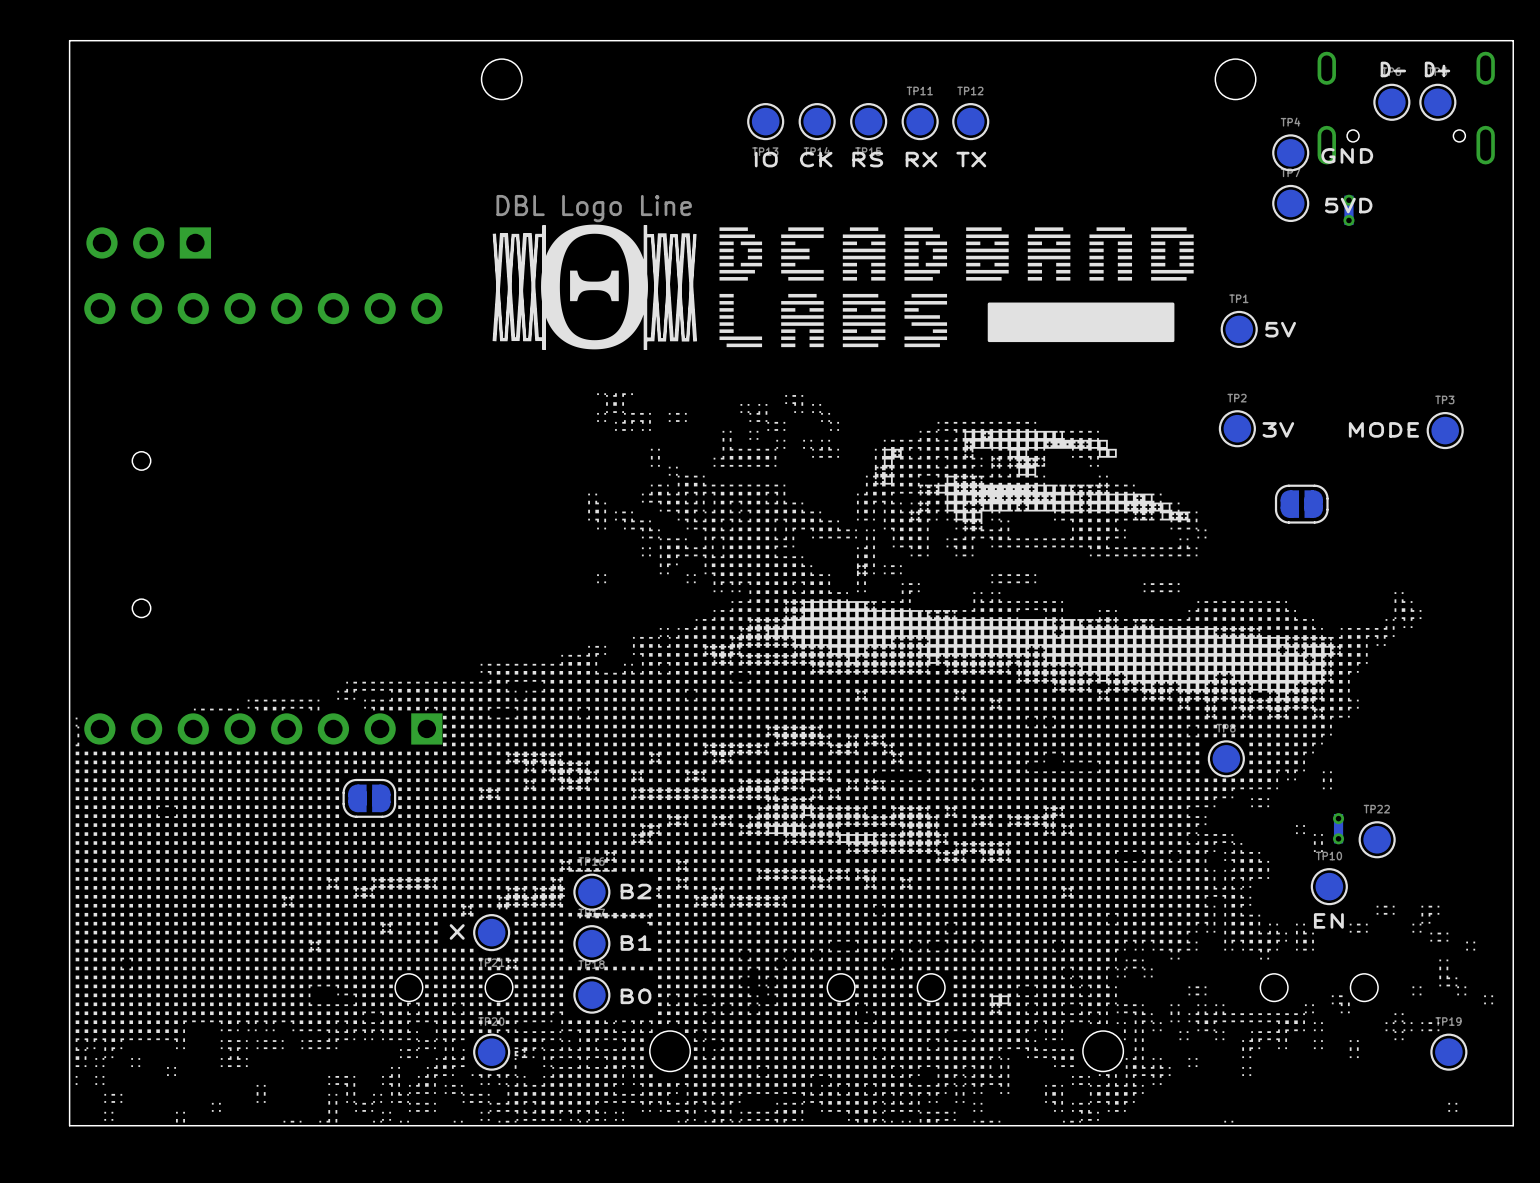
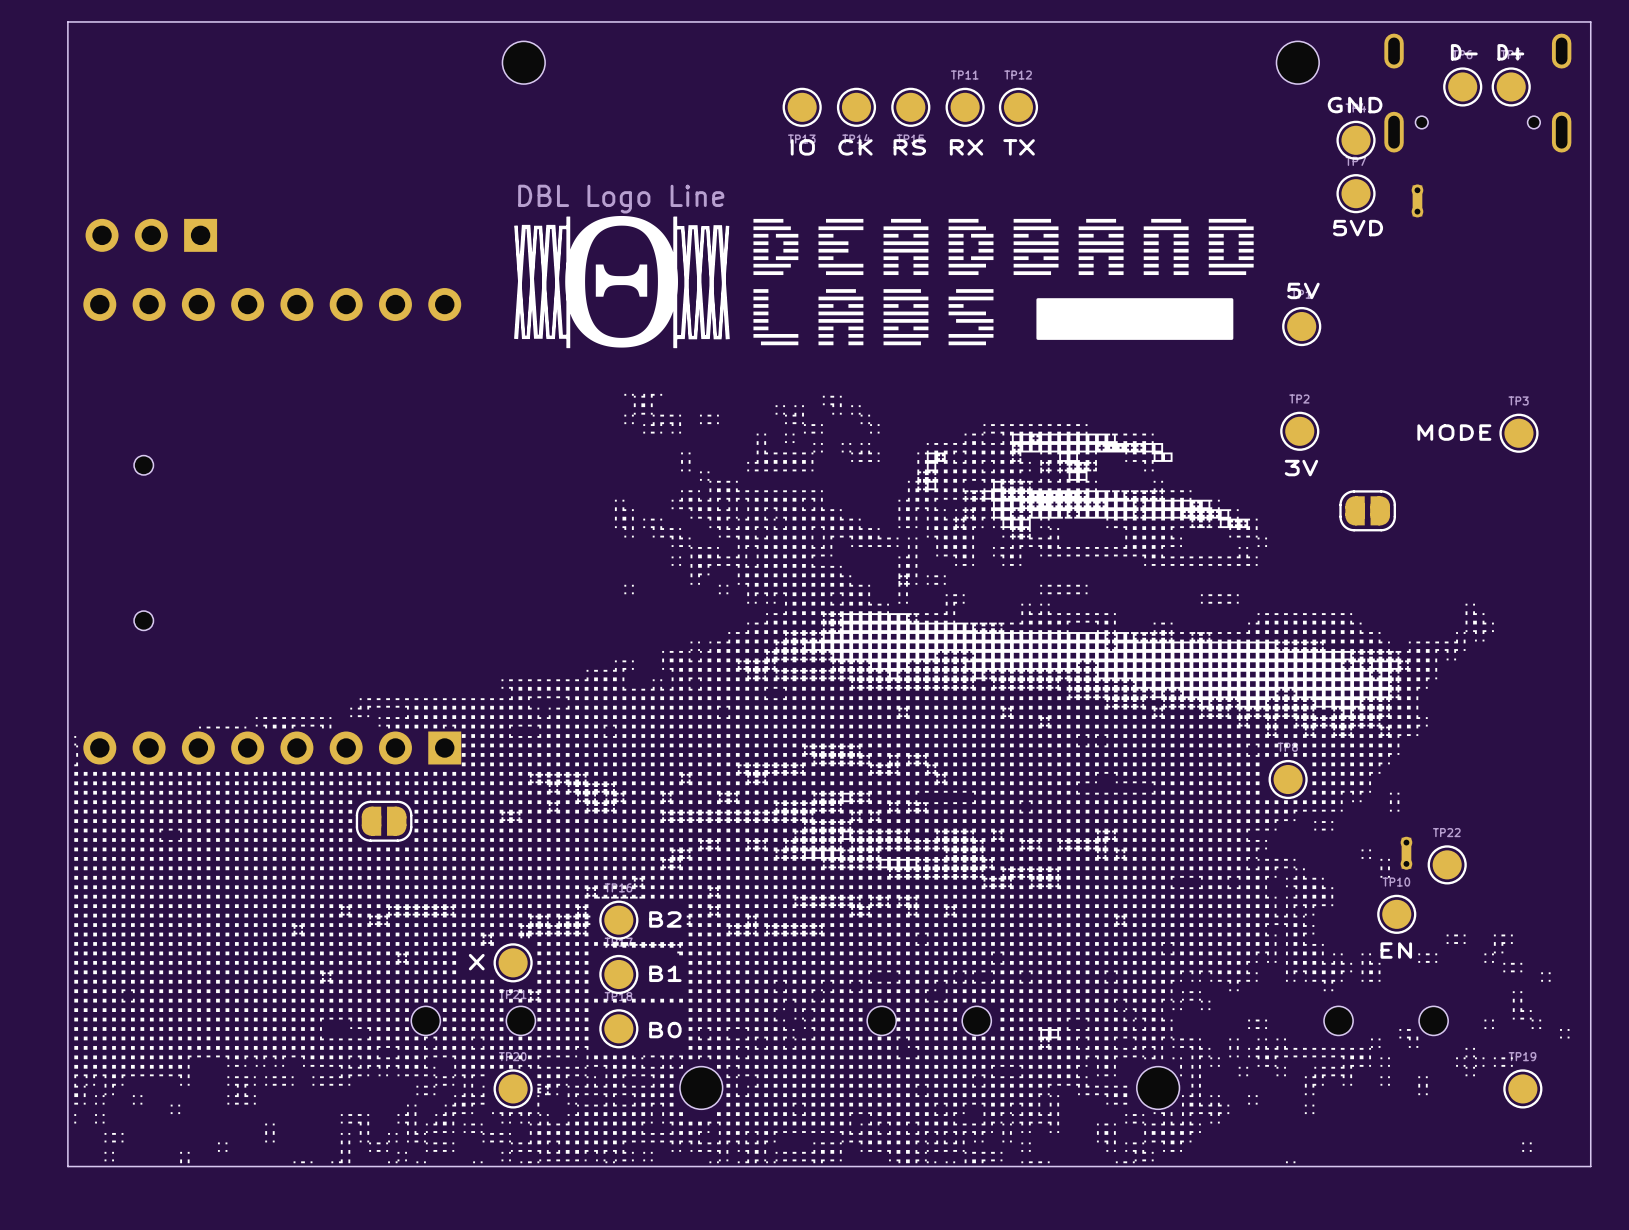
text position: GND (1347, 155) -> GND (1355, 105)
text position: 5VD (1348, 205) -> 5VD (1358, 228)
text position: 5V (1280, 329) -> 5V (1303, 290)
text position: 3V (1278, 429) -> 3V (1301, 468)

